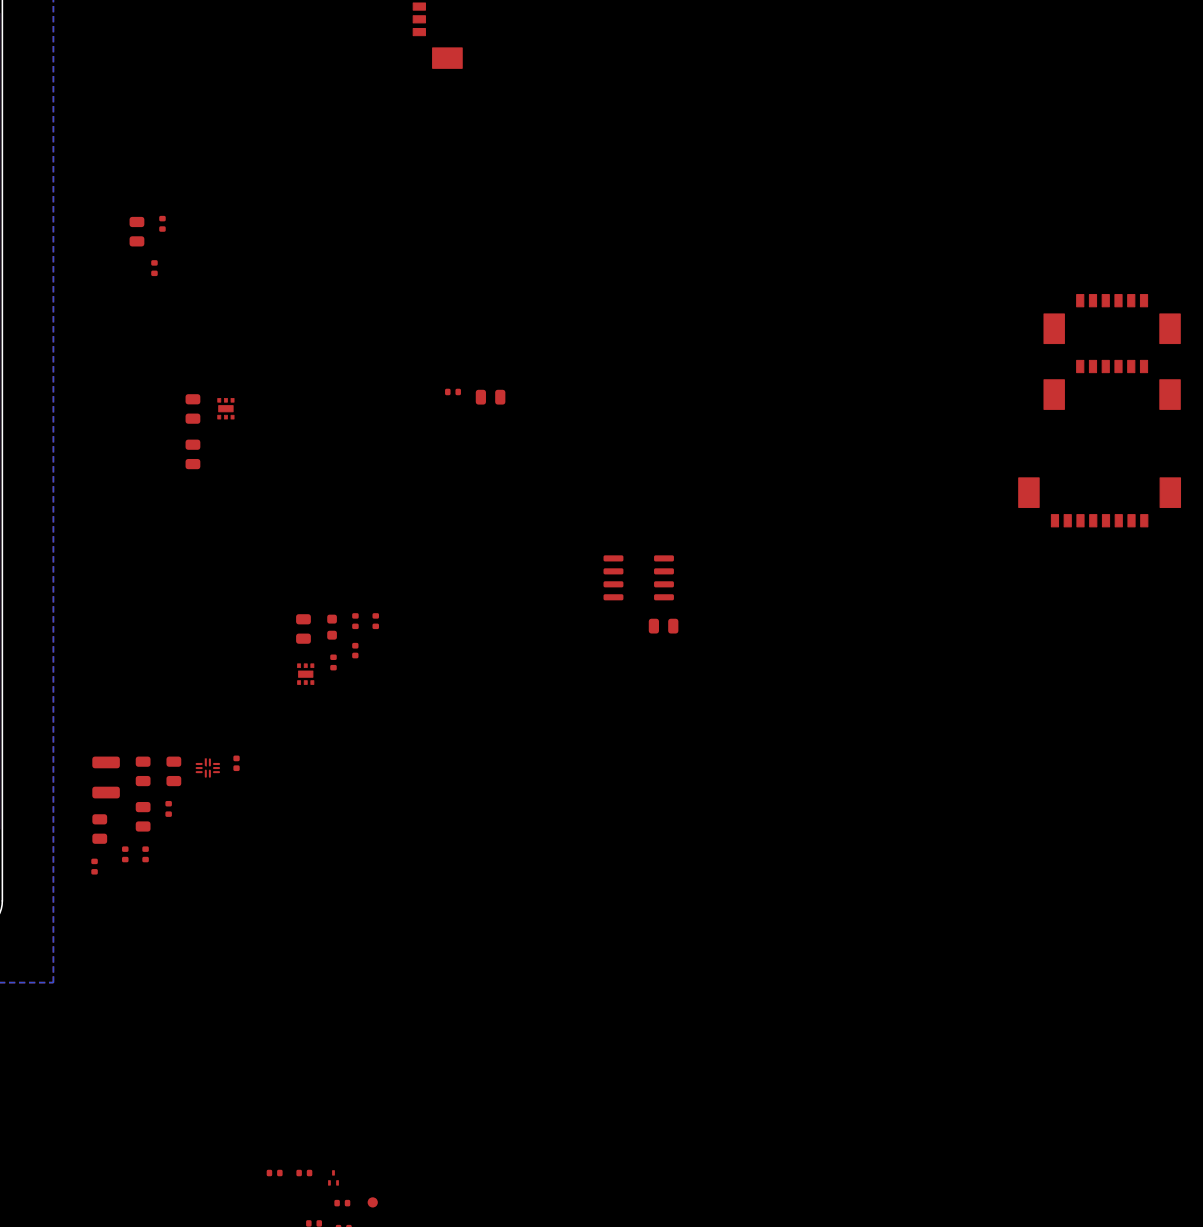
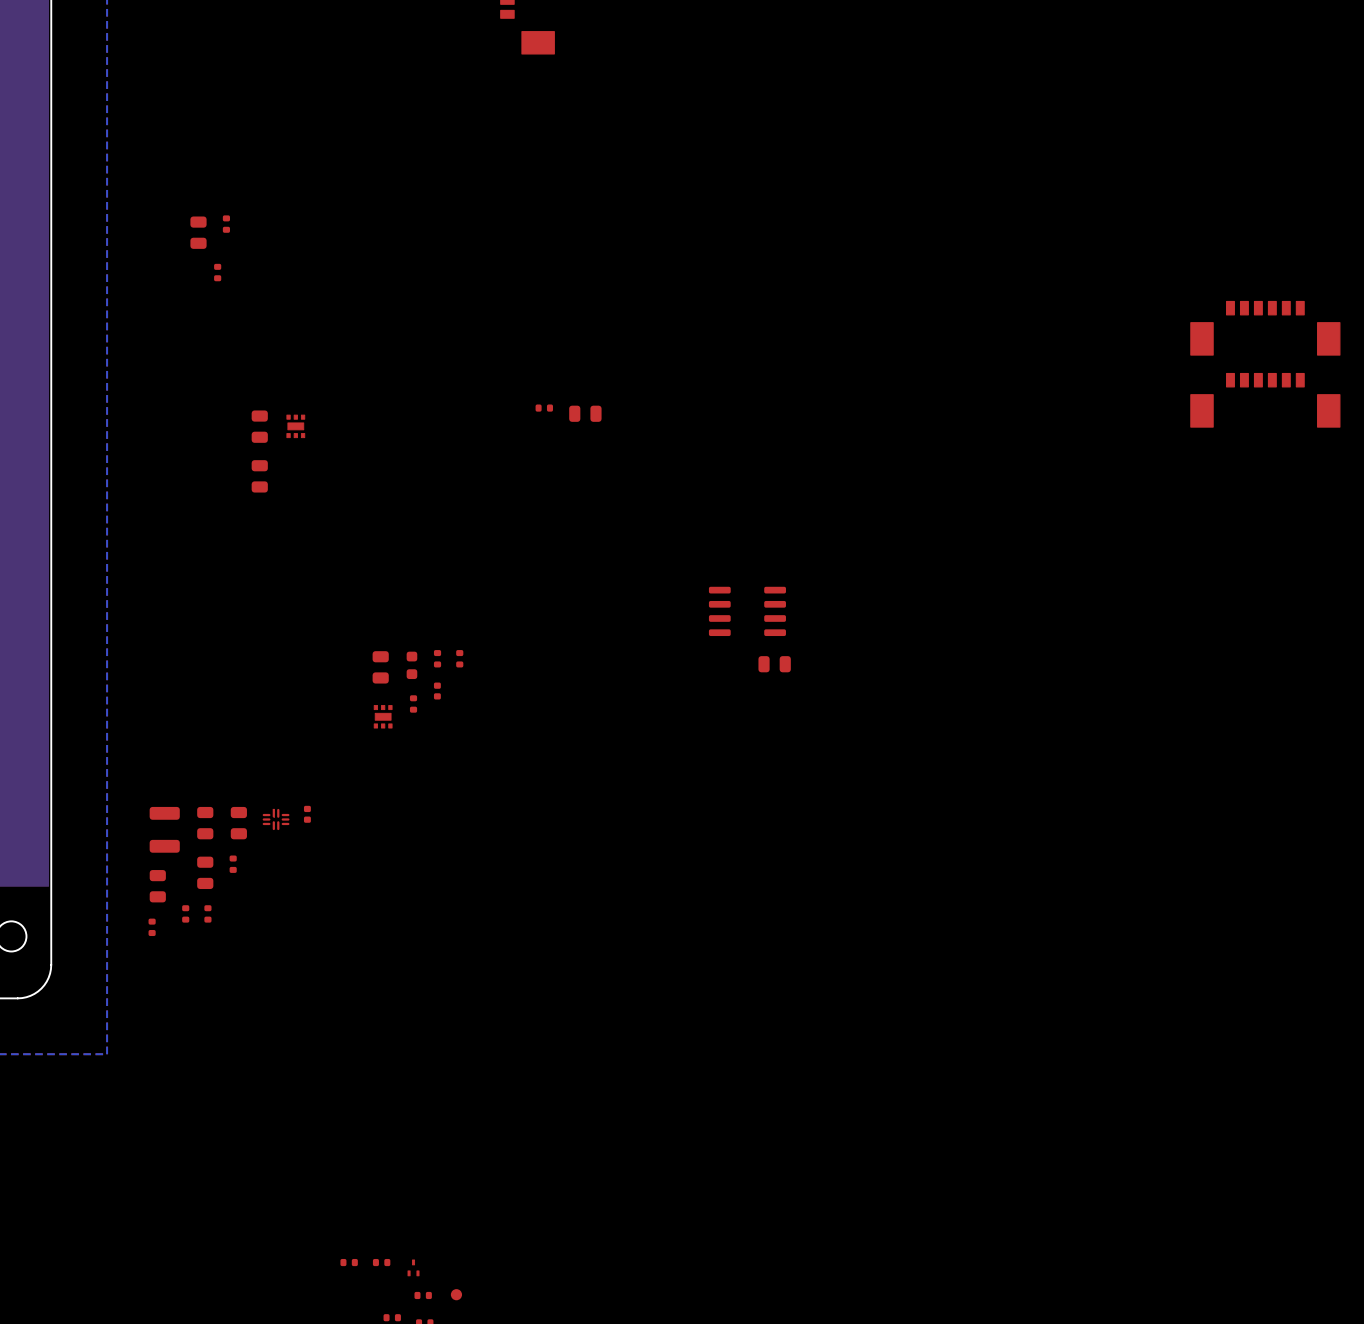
part: (1099, 502) -> none

